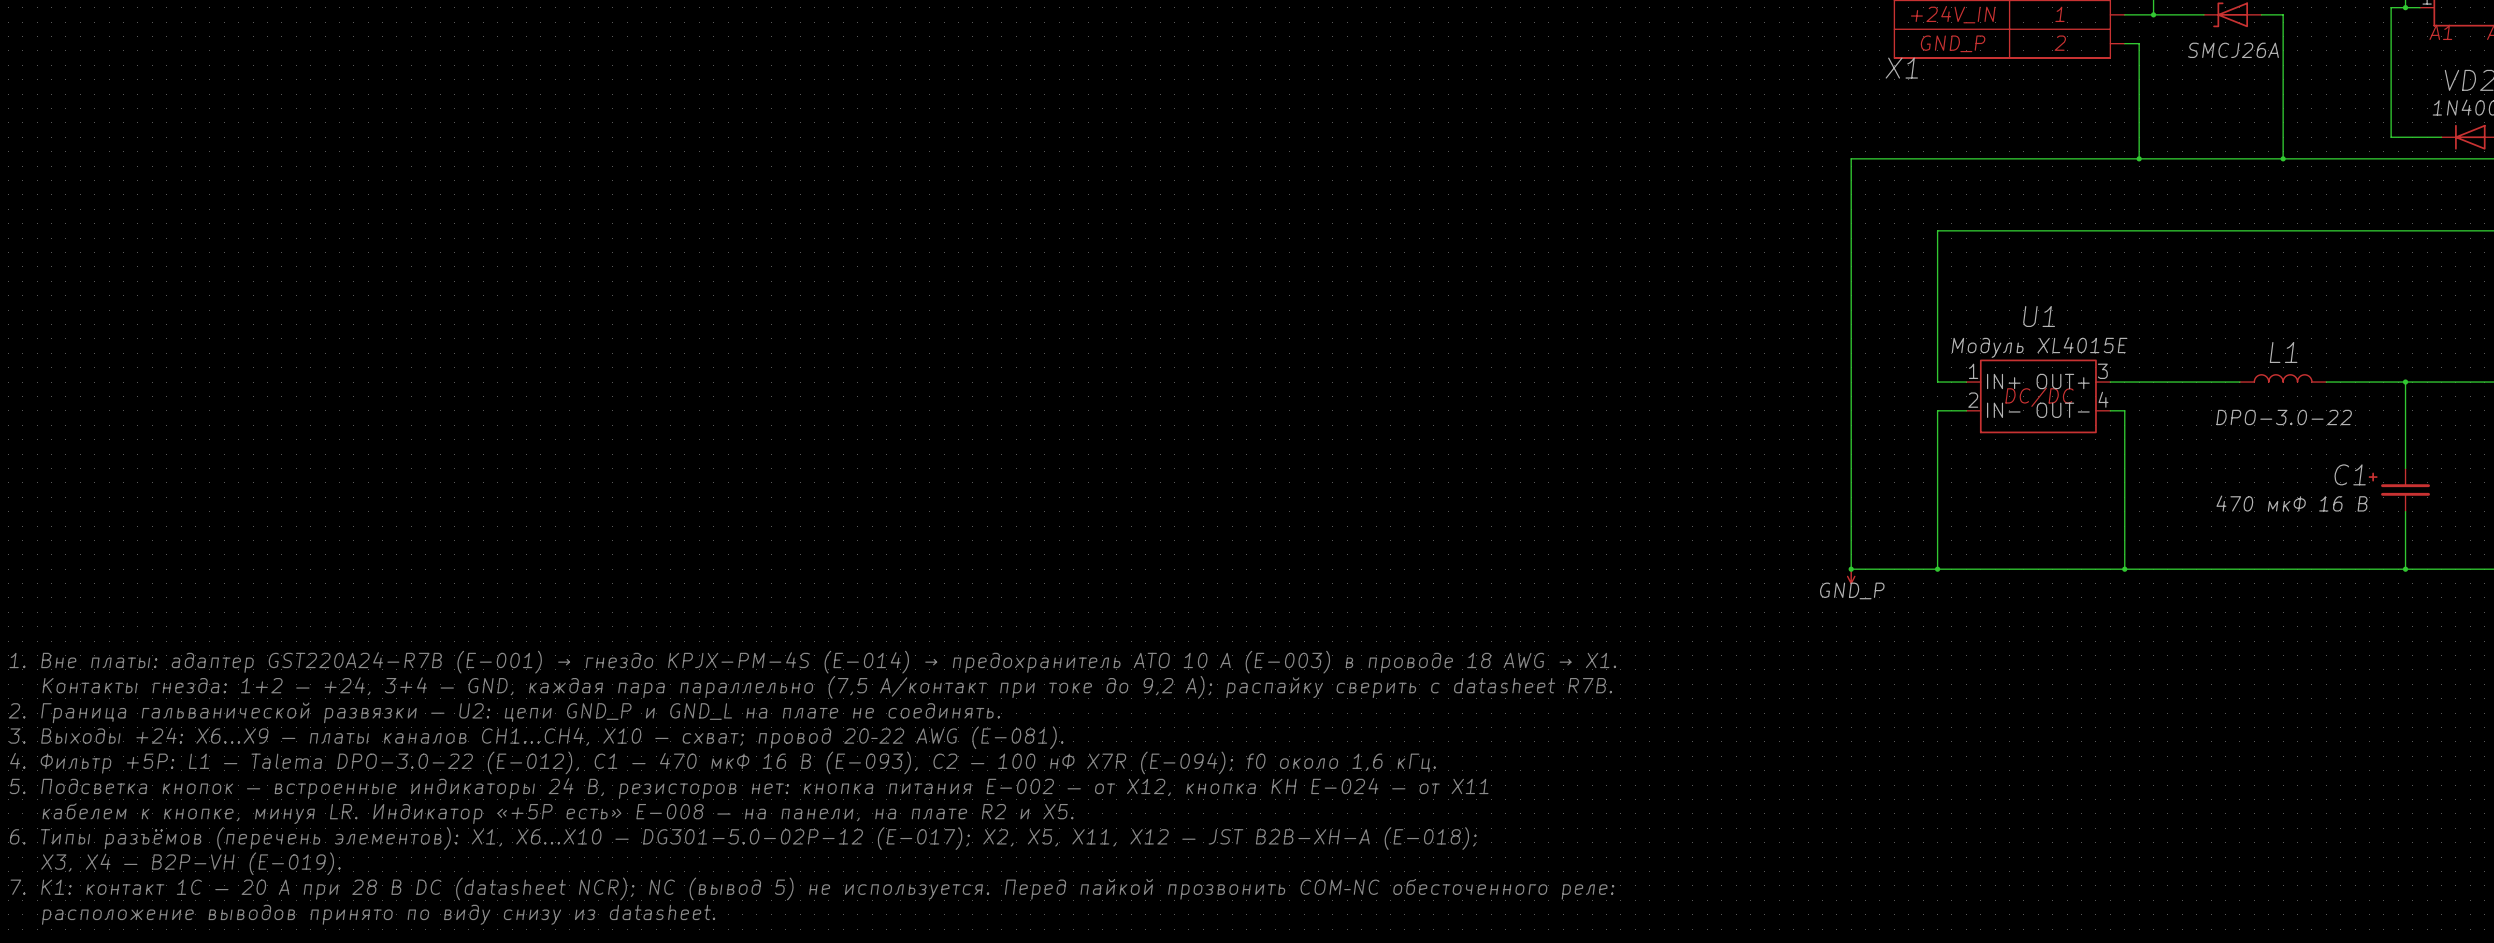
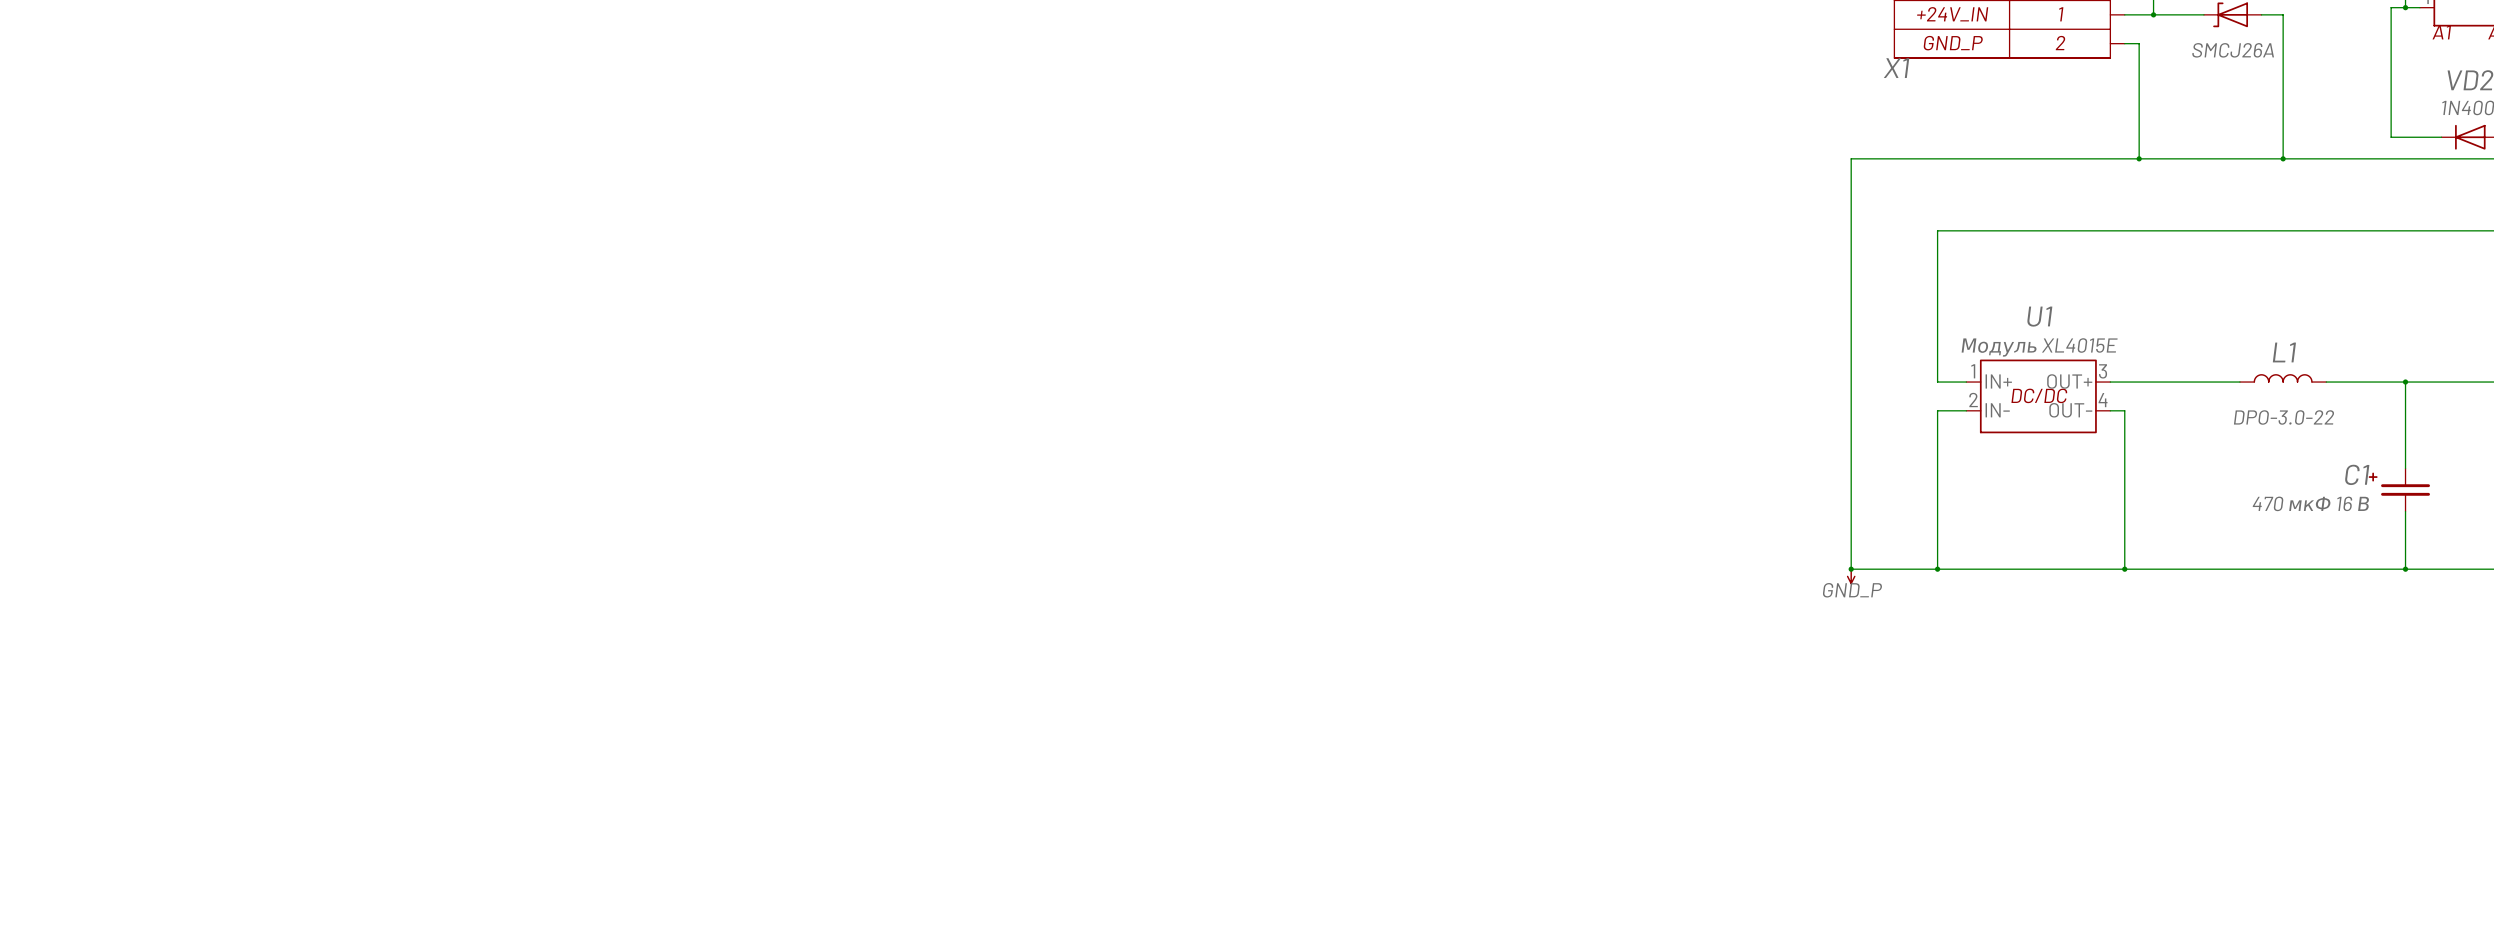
text: 1. Вне платы: адаптер GST220A24-R7B (E-001) → гнездо KPJX-PM-4S (E-014) → предохранитель ATO 10 А (E-003) в проводе 18 AWG → X1. (812, 662) -> none
text: Контакты гнезда: 1+2 — +24, 3+4 — GND, каждая пара параллельно (7,5 А/контакт при токе до 9,2 А); распайку сверить с datasheet R7B. (827, 687) -> none
text: 2. Граница гальванической развязки — U2: цепи GND_P и GND_L на плате не соединять. (504, 712) -> none
text: 3. Выходы +24: X6…X9 — платы каналов CH1…CH4, X10 — схват; провод 20–22 AWG (E-081). (536, 737) -> none
text: 4. Фильтр +5P: L1 — Talema DPO-3.0-22 (E-012), C1 — 470 мкФ 16 В (E-093), C2 — 100 нФ X7R (E-094); f0 около 1,6 кГц. (723, 762) -> none
text: 5. Подсветка кнопок — встроенные индикаторы 24 В, резисторов нет: кнопка питания E-002 — от X12, кнопка KH E-024 — от X11 (749, 788) -> none
text: кабелем к кнопке, минуя LR. Индикатор «+5P есть» E-008 — на панели, на плате R2 и X5. (558, 813) -> none
text: 6. Типы разъёмов (перечень элементов): X1, X6…X10 — DG301-5.0-02P-12 (E-017); X2, X5, X11, X12 — JST B2B-XH-A (E-018); (743, 838) -> none
text: X3, X4 — B2P-VH (E-019). (190, 863) -> none
text: 7. K1: контакт 1C — 20 А при 28 В DC (datasheet NCR); NC (вывод 5) не используется. Перед пайкой прозвонить COM–NC обесточенного реле: (812, 888) -> none
text: расположение выводов принято по виду снизу из datasheet. (378, 914) -> none

